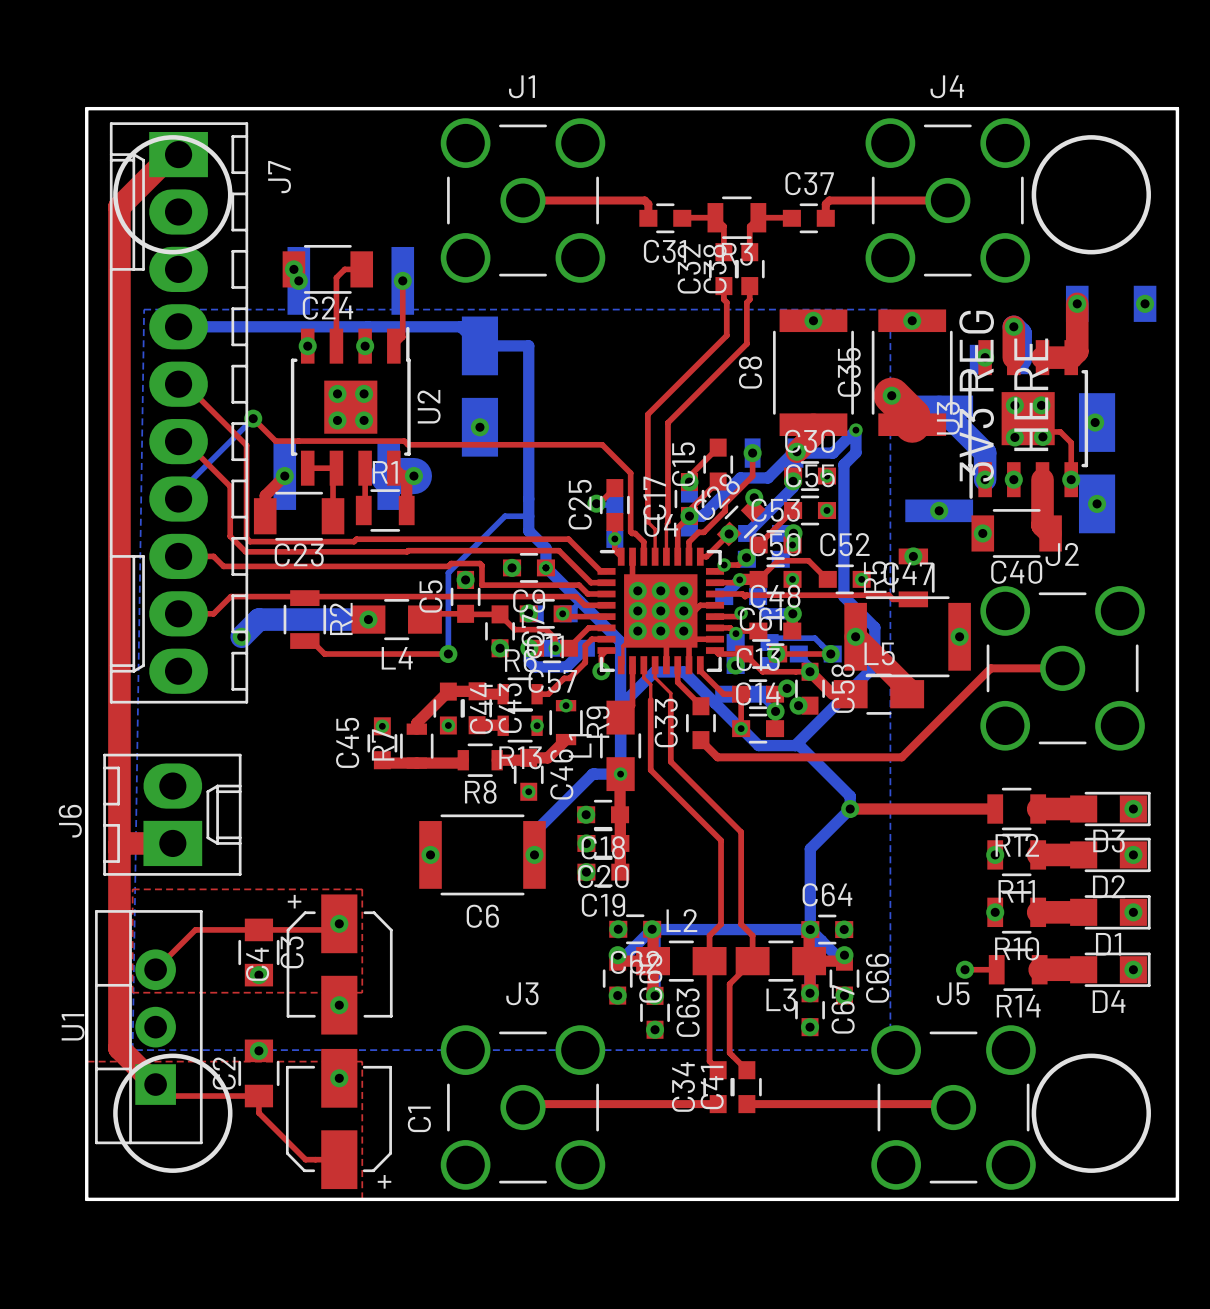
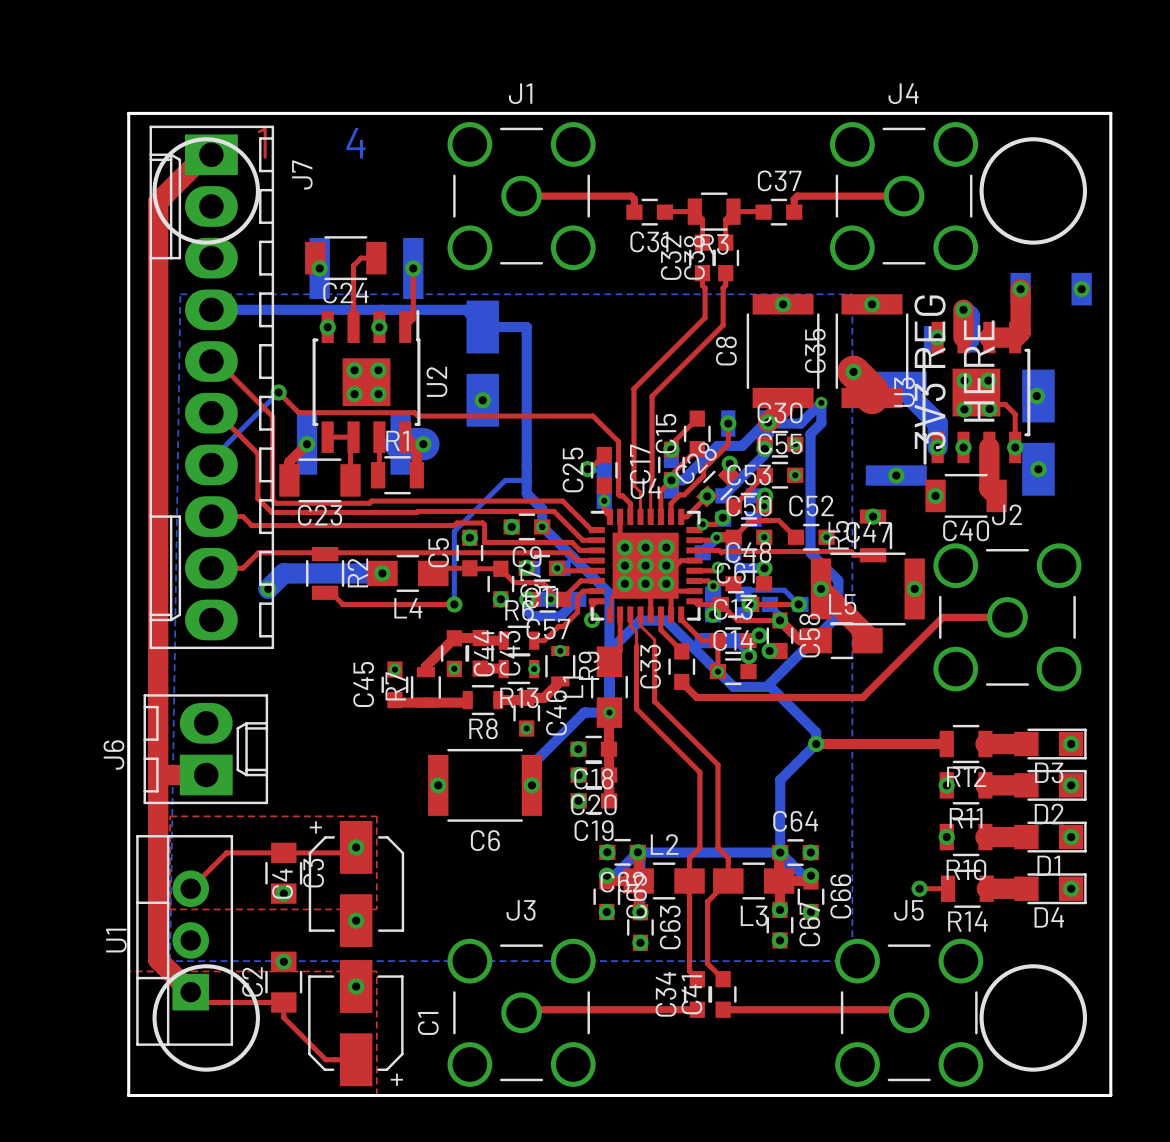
text: none -> 1 (262, 143)
text: none -> 4 (355, 143)
via: (293, 269) -> none

